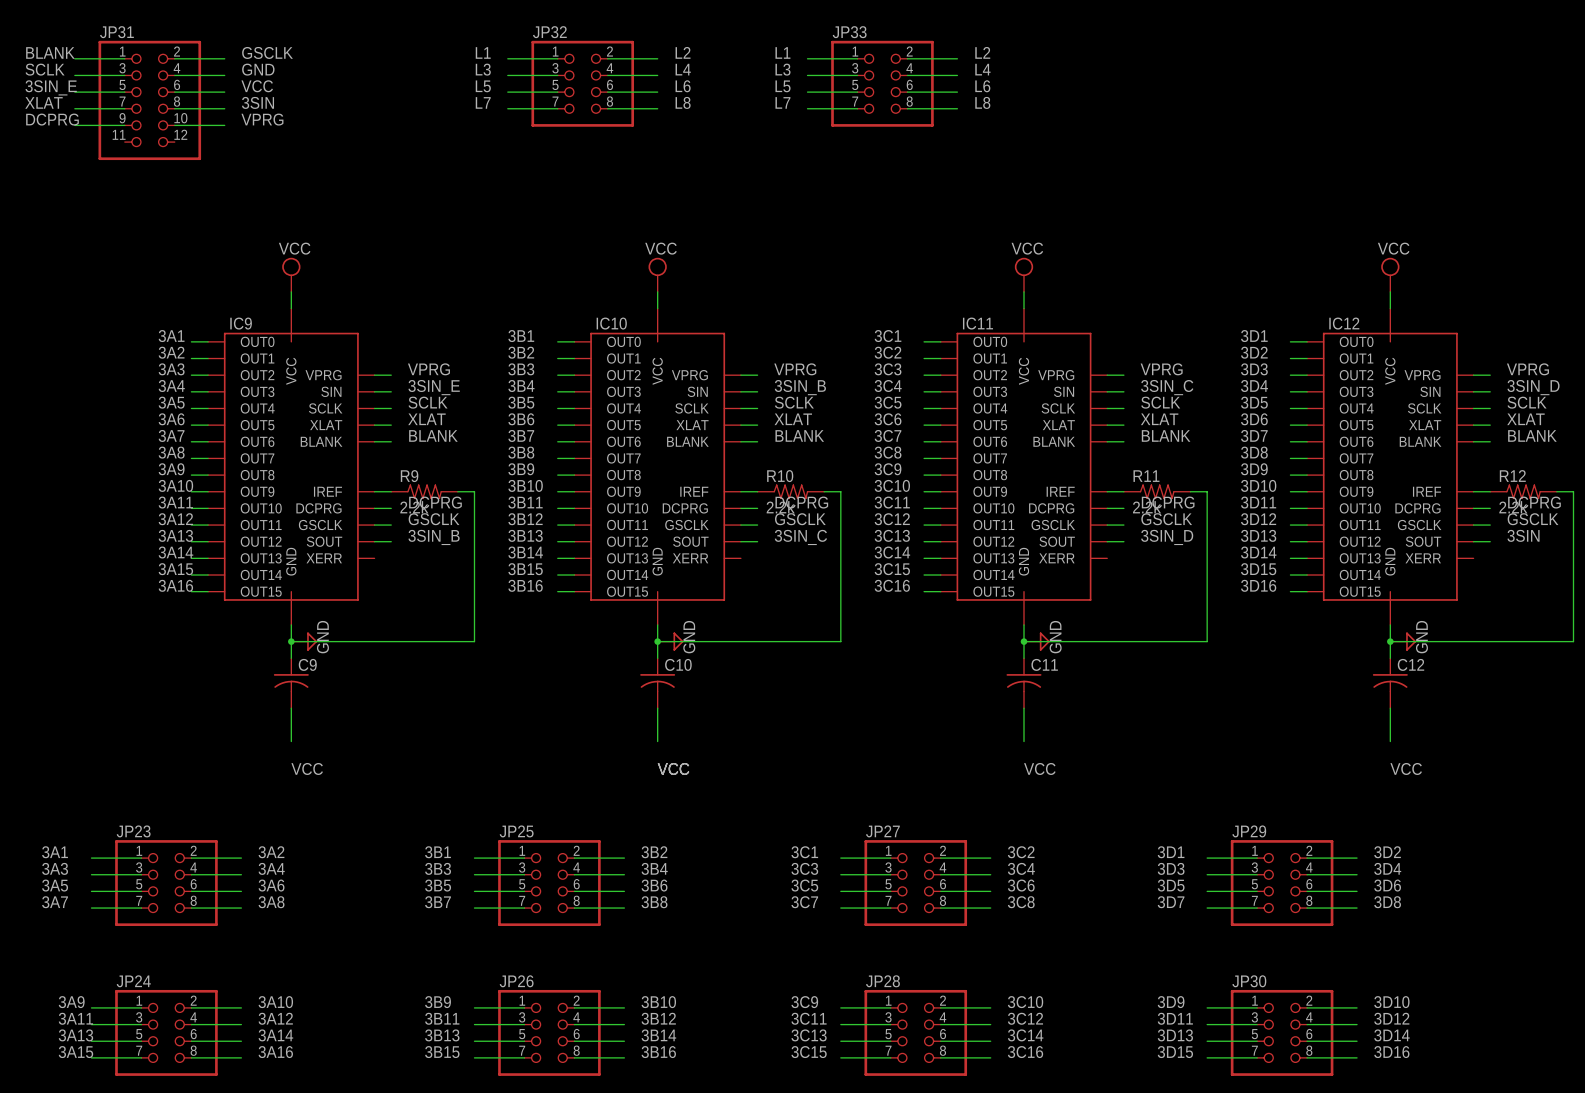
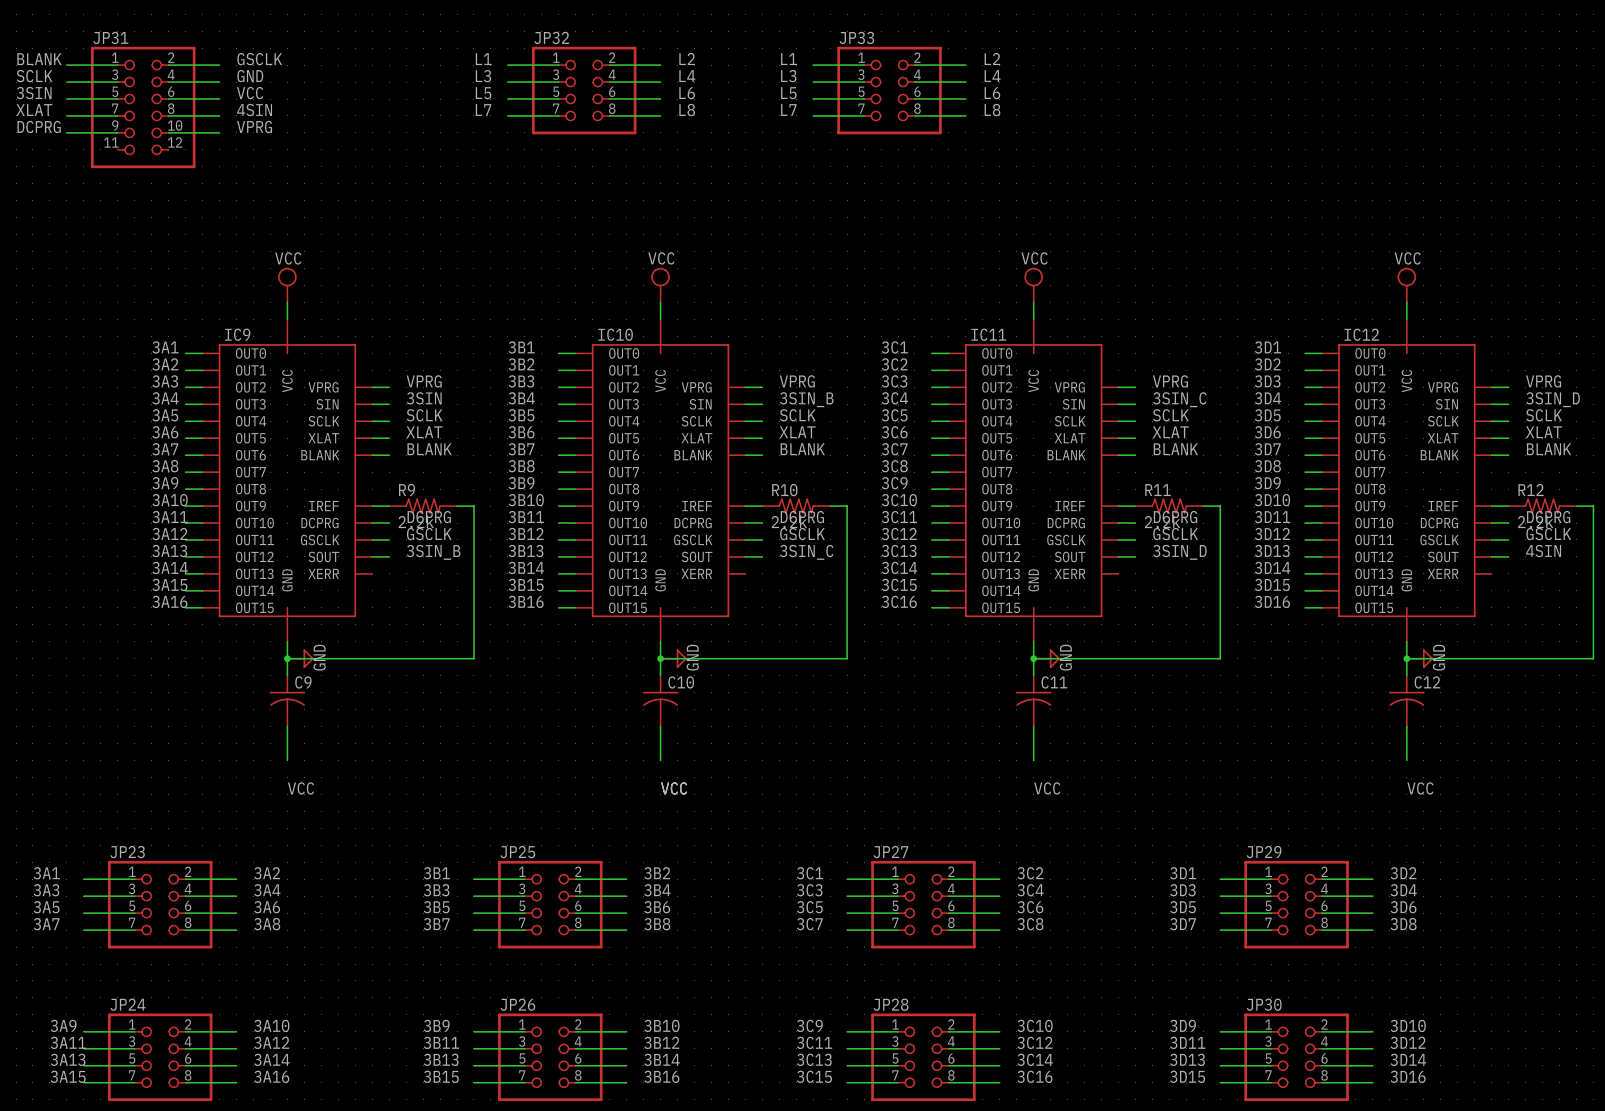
label: 3SIN_E (51, 87) -> 3SIN (34, 93)
label: 3SIN (257, 102) -> 4SIN (254, 110)
label: 3SIN_E (434, 387) -> 3SIN (424, 398)
label: 3SIN (1523, 535) -> 4SIN (1543, 551)

